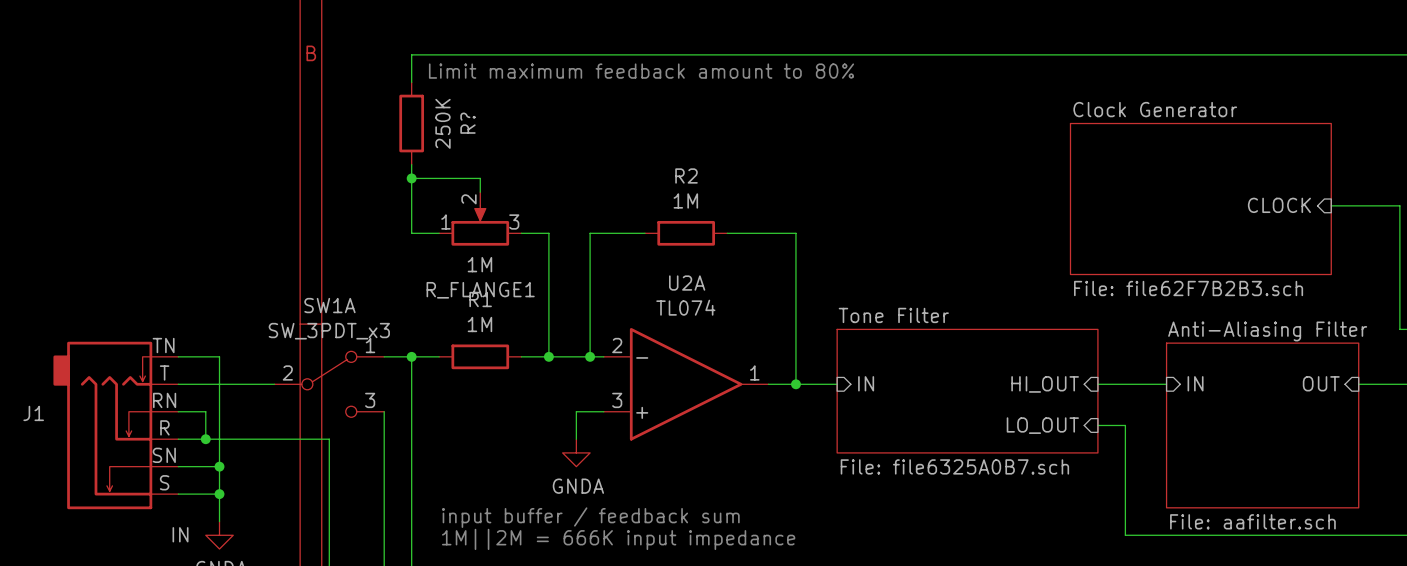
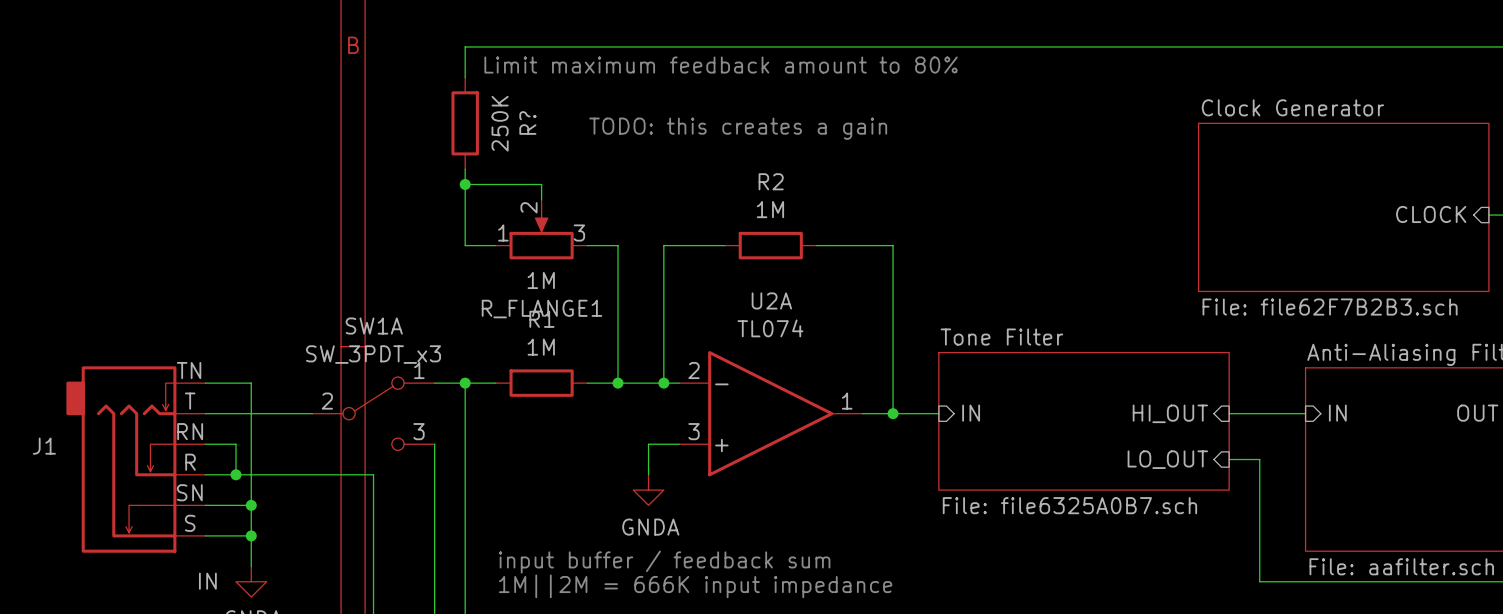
text: none -> TODO: this creates a gain (738, 128)

